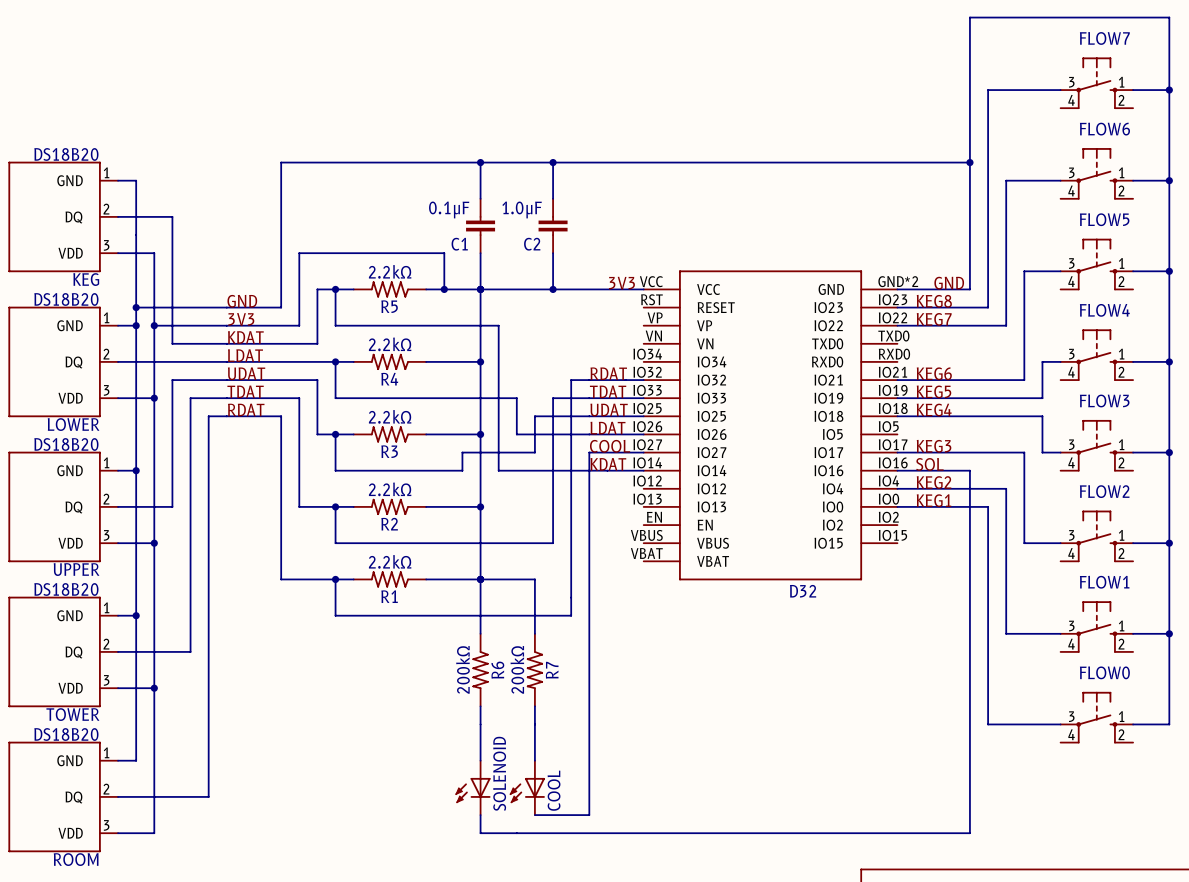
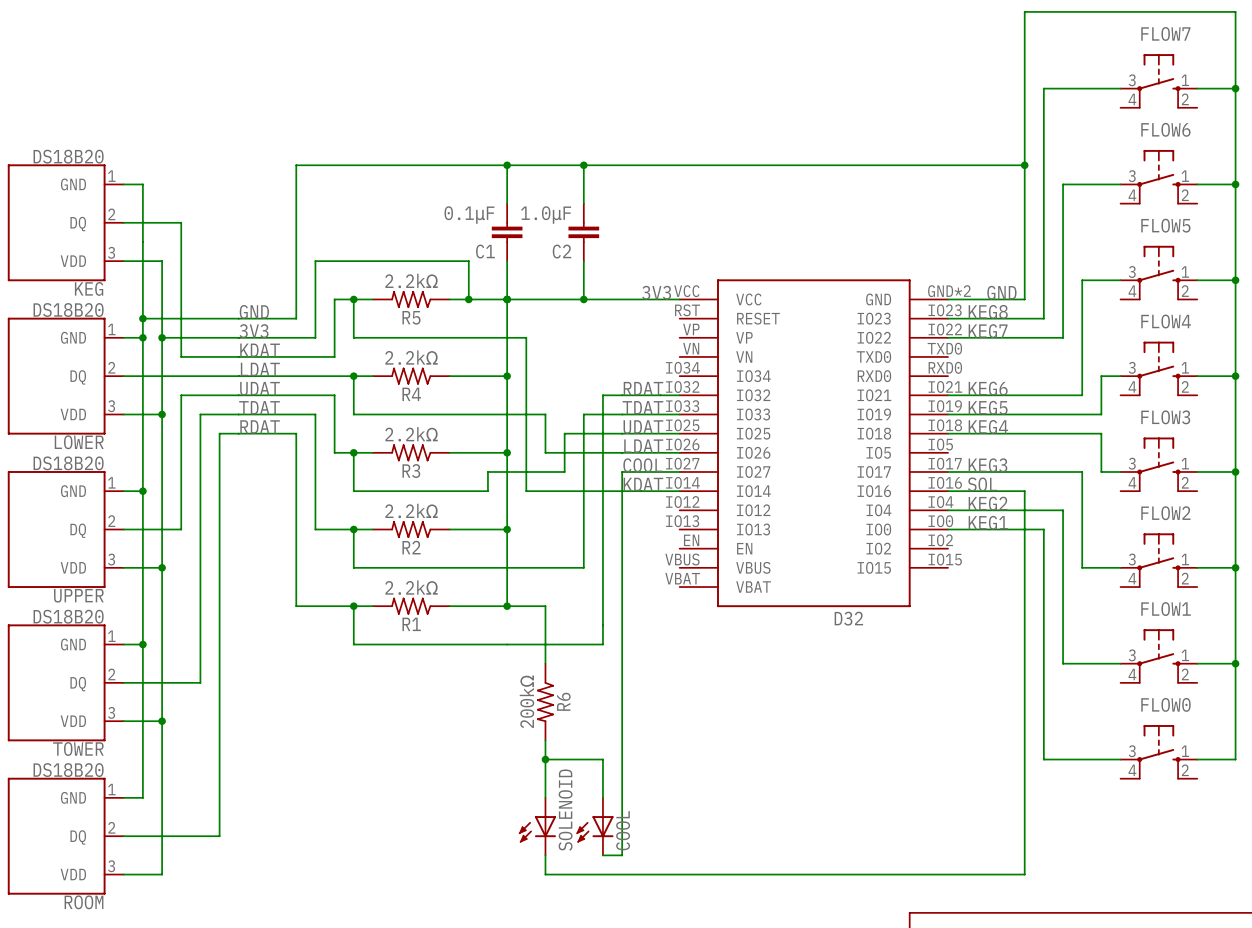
wire: (480, 579) (480, 633) -> none
wire: (516, 579) (534, 579) (534, 633) -> (545, 606) (545, 663)
R6 position: (480, 670) -> (545, 702)
R7: 200kΩ (534, 670) -> none
wire: (480, 706) (480, 760) -> (545, 740) (545, 797)
wire: (534, 706) (534, 760) -> none
wire: none -> (545, 759) (602, 759) (602, 797)
junction: none -> (545, 759)
SOLENOID position: (473, 787) -> (537, 826)
COOL position: (527, 787) -> (595, 826)
wire: (480, 815) (480, 833) (516, 833) -> (545, 855) (545, 874)
wire: (534, 815) (571, 815) -> none

